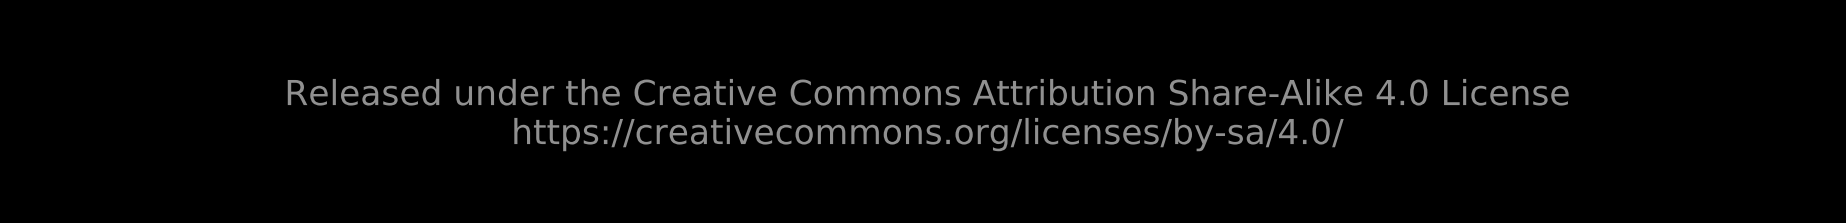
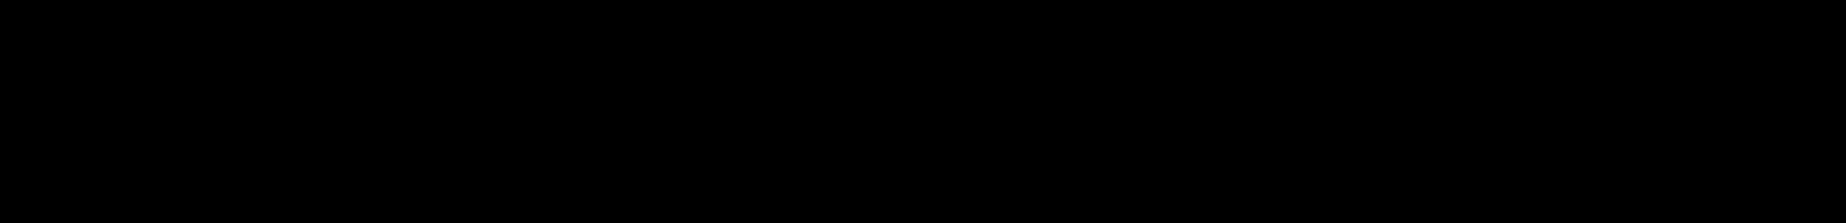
drawing: [287, 78, 1569, 152] -> none

